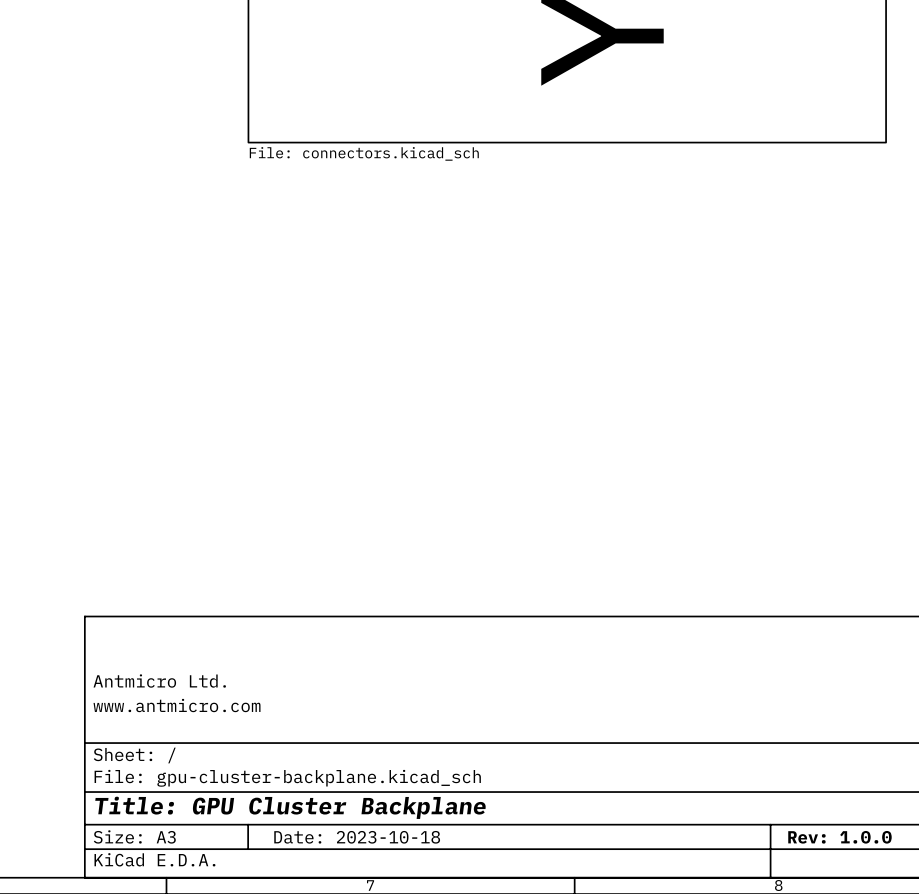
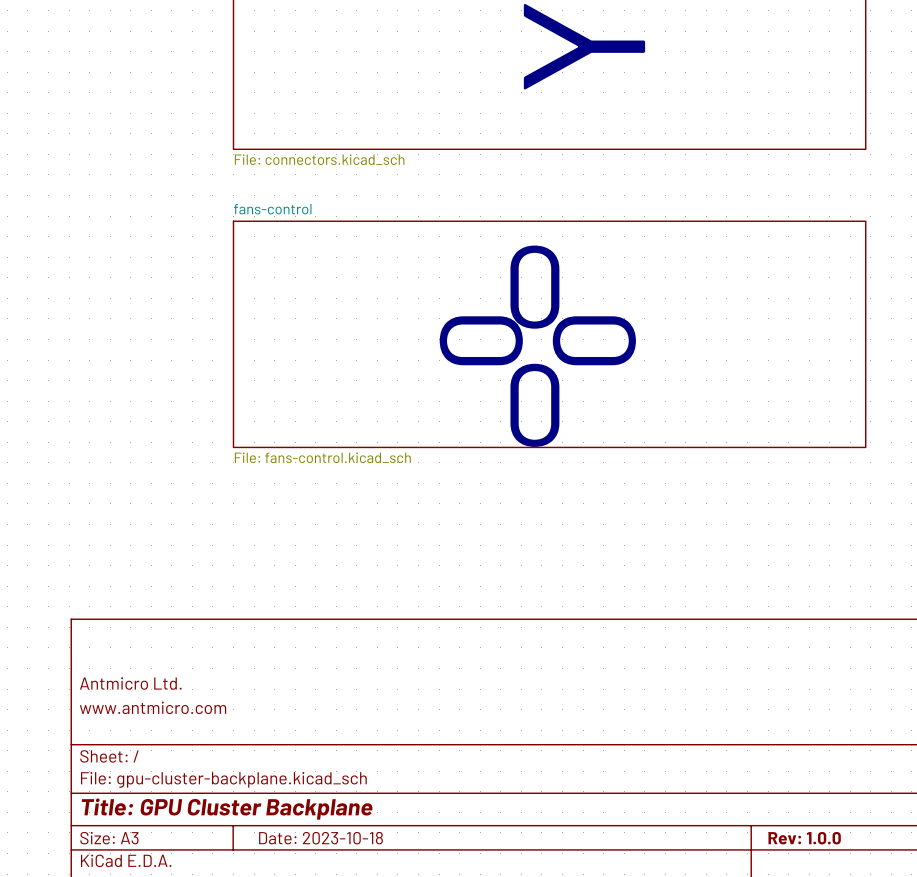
text: none -> 0 (534, 287)
sheet fans-control: none -> File: fans-control.kicad_sch (549, 334)
text: none -> 0 (481, 340)
text: none -> 0 (594, 340)
text: none -> 0 (534, 405)

